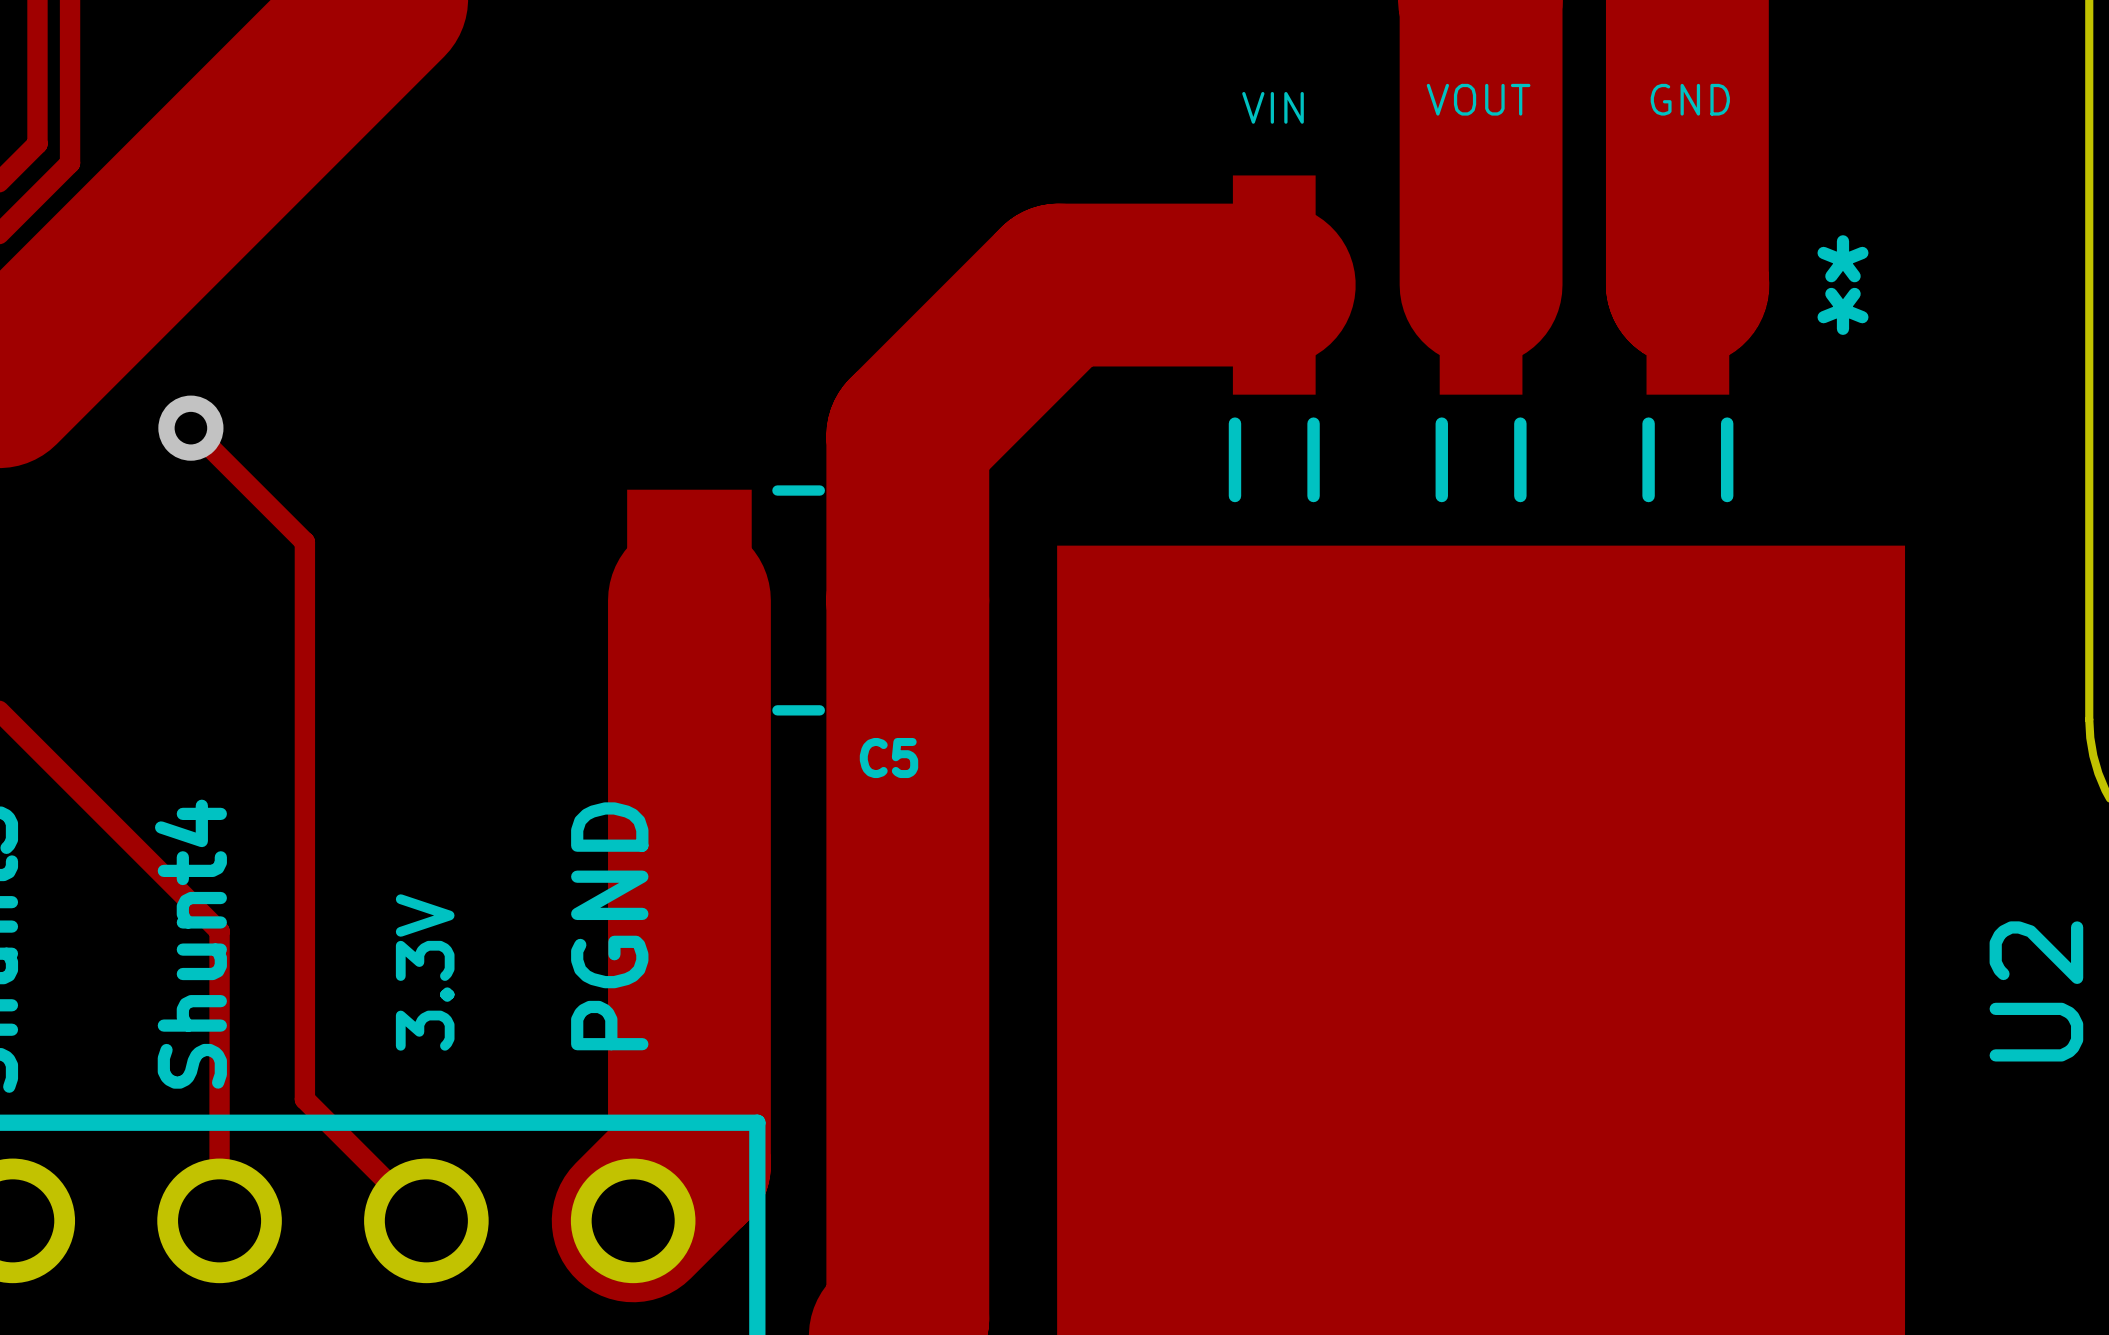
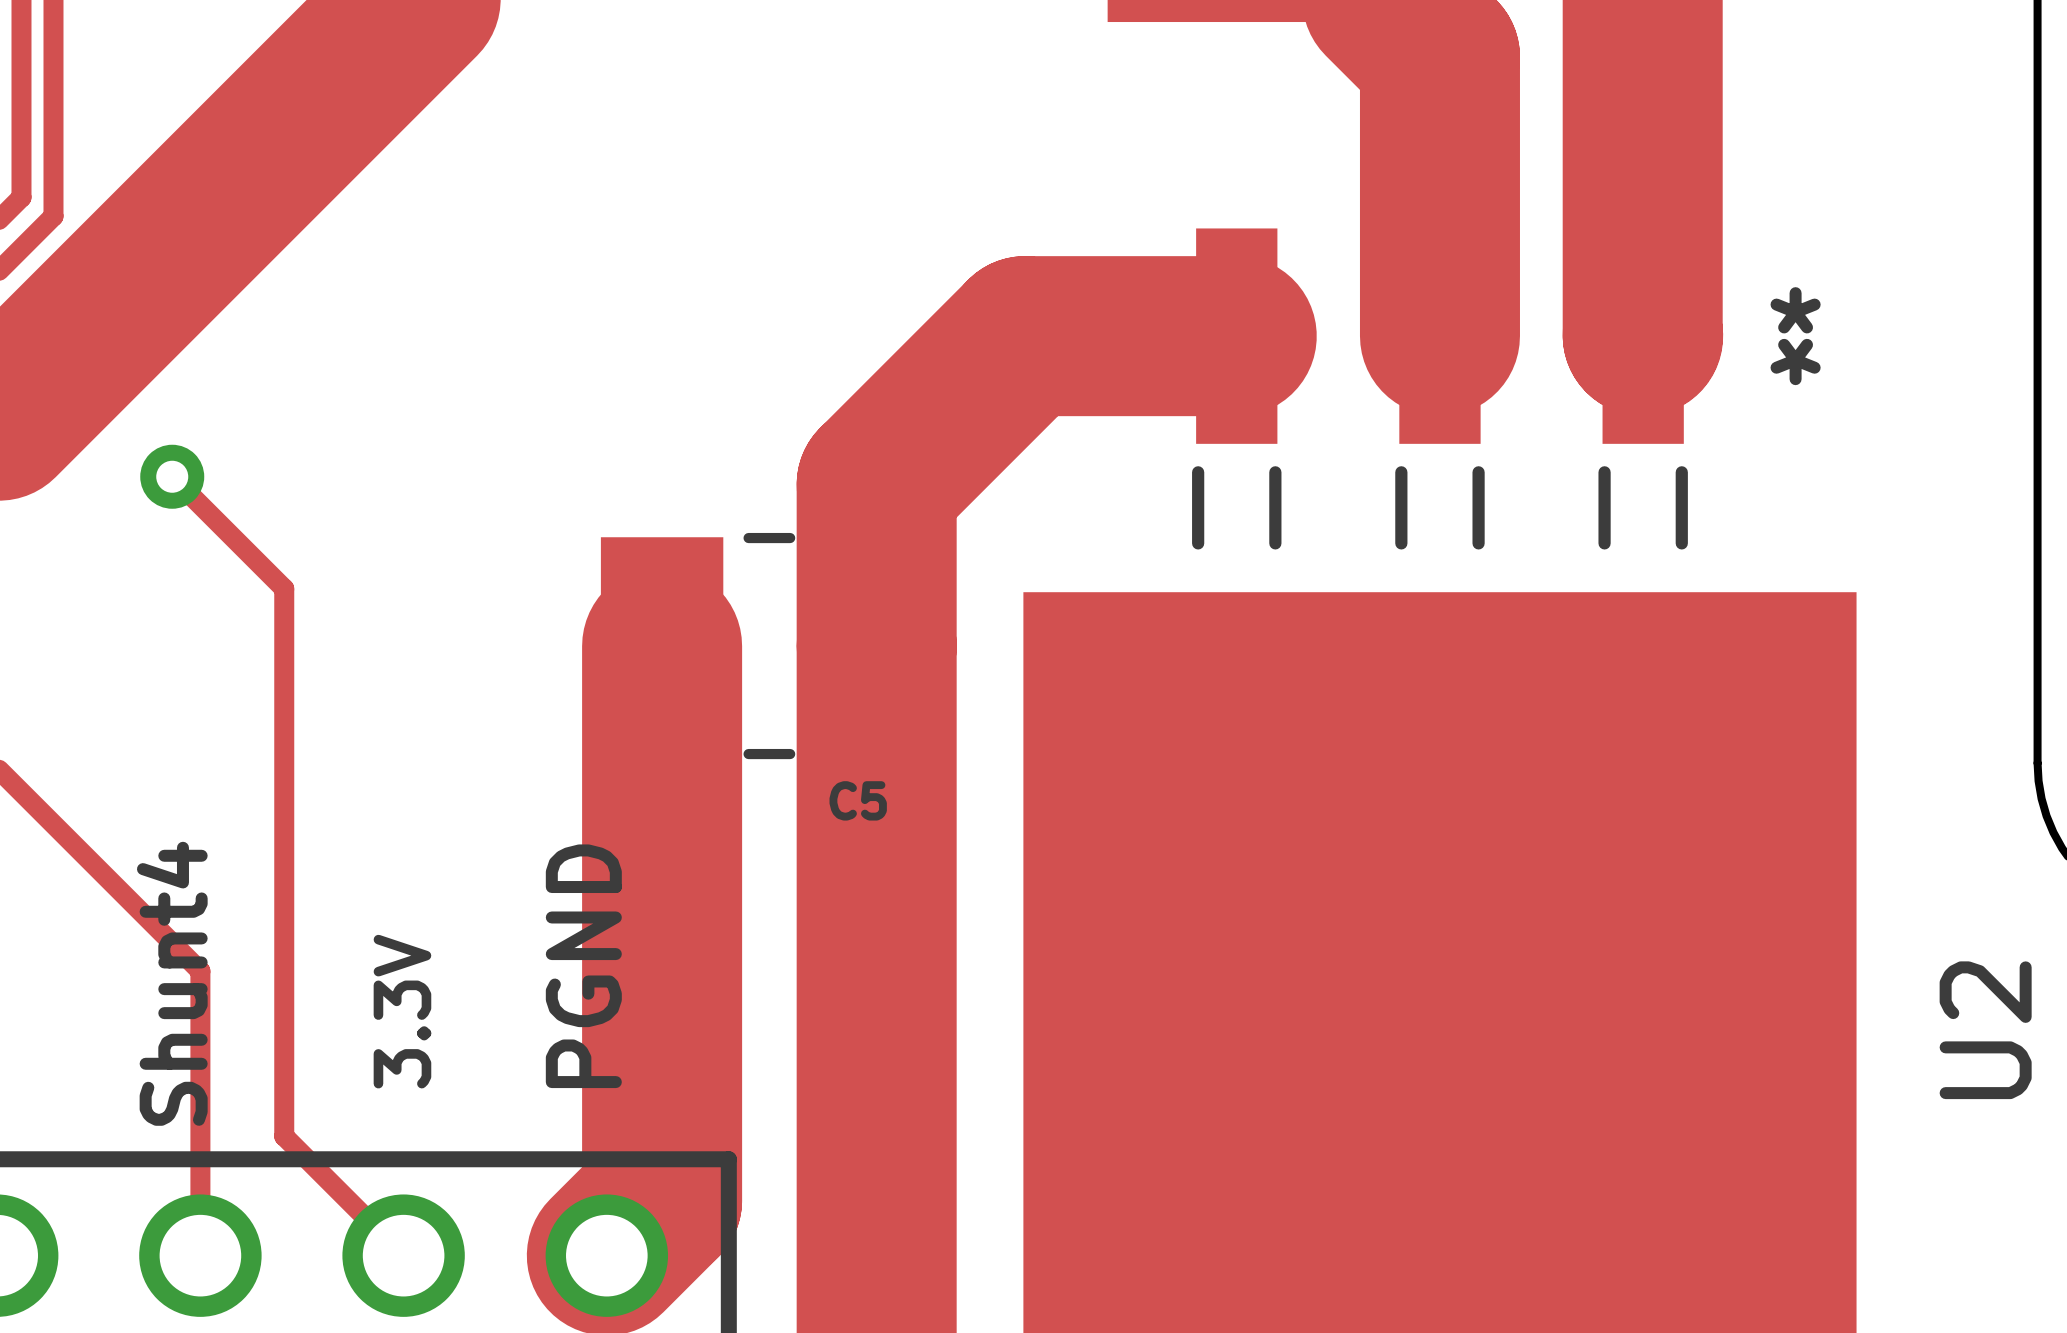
text: VOUT (1478, 99) -> none
text: GND (1690, 99) -> none
text: VIN (1273, 107) -> none

